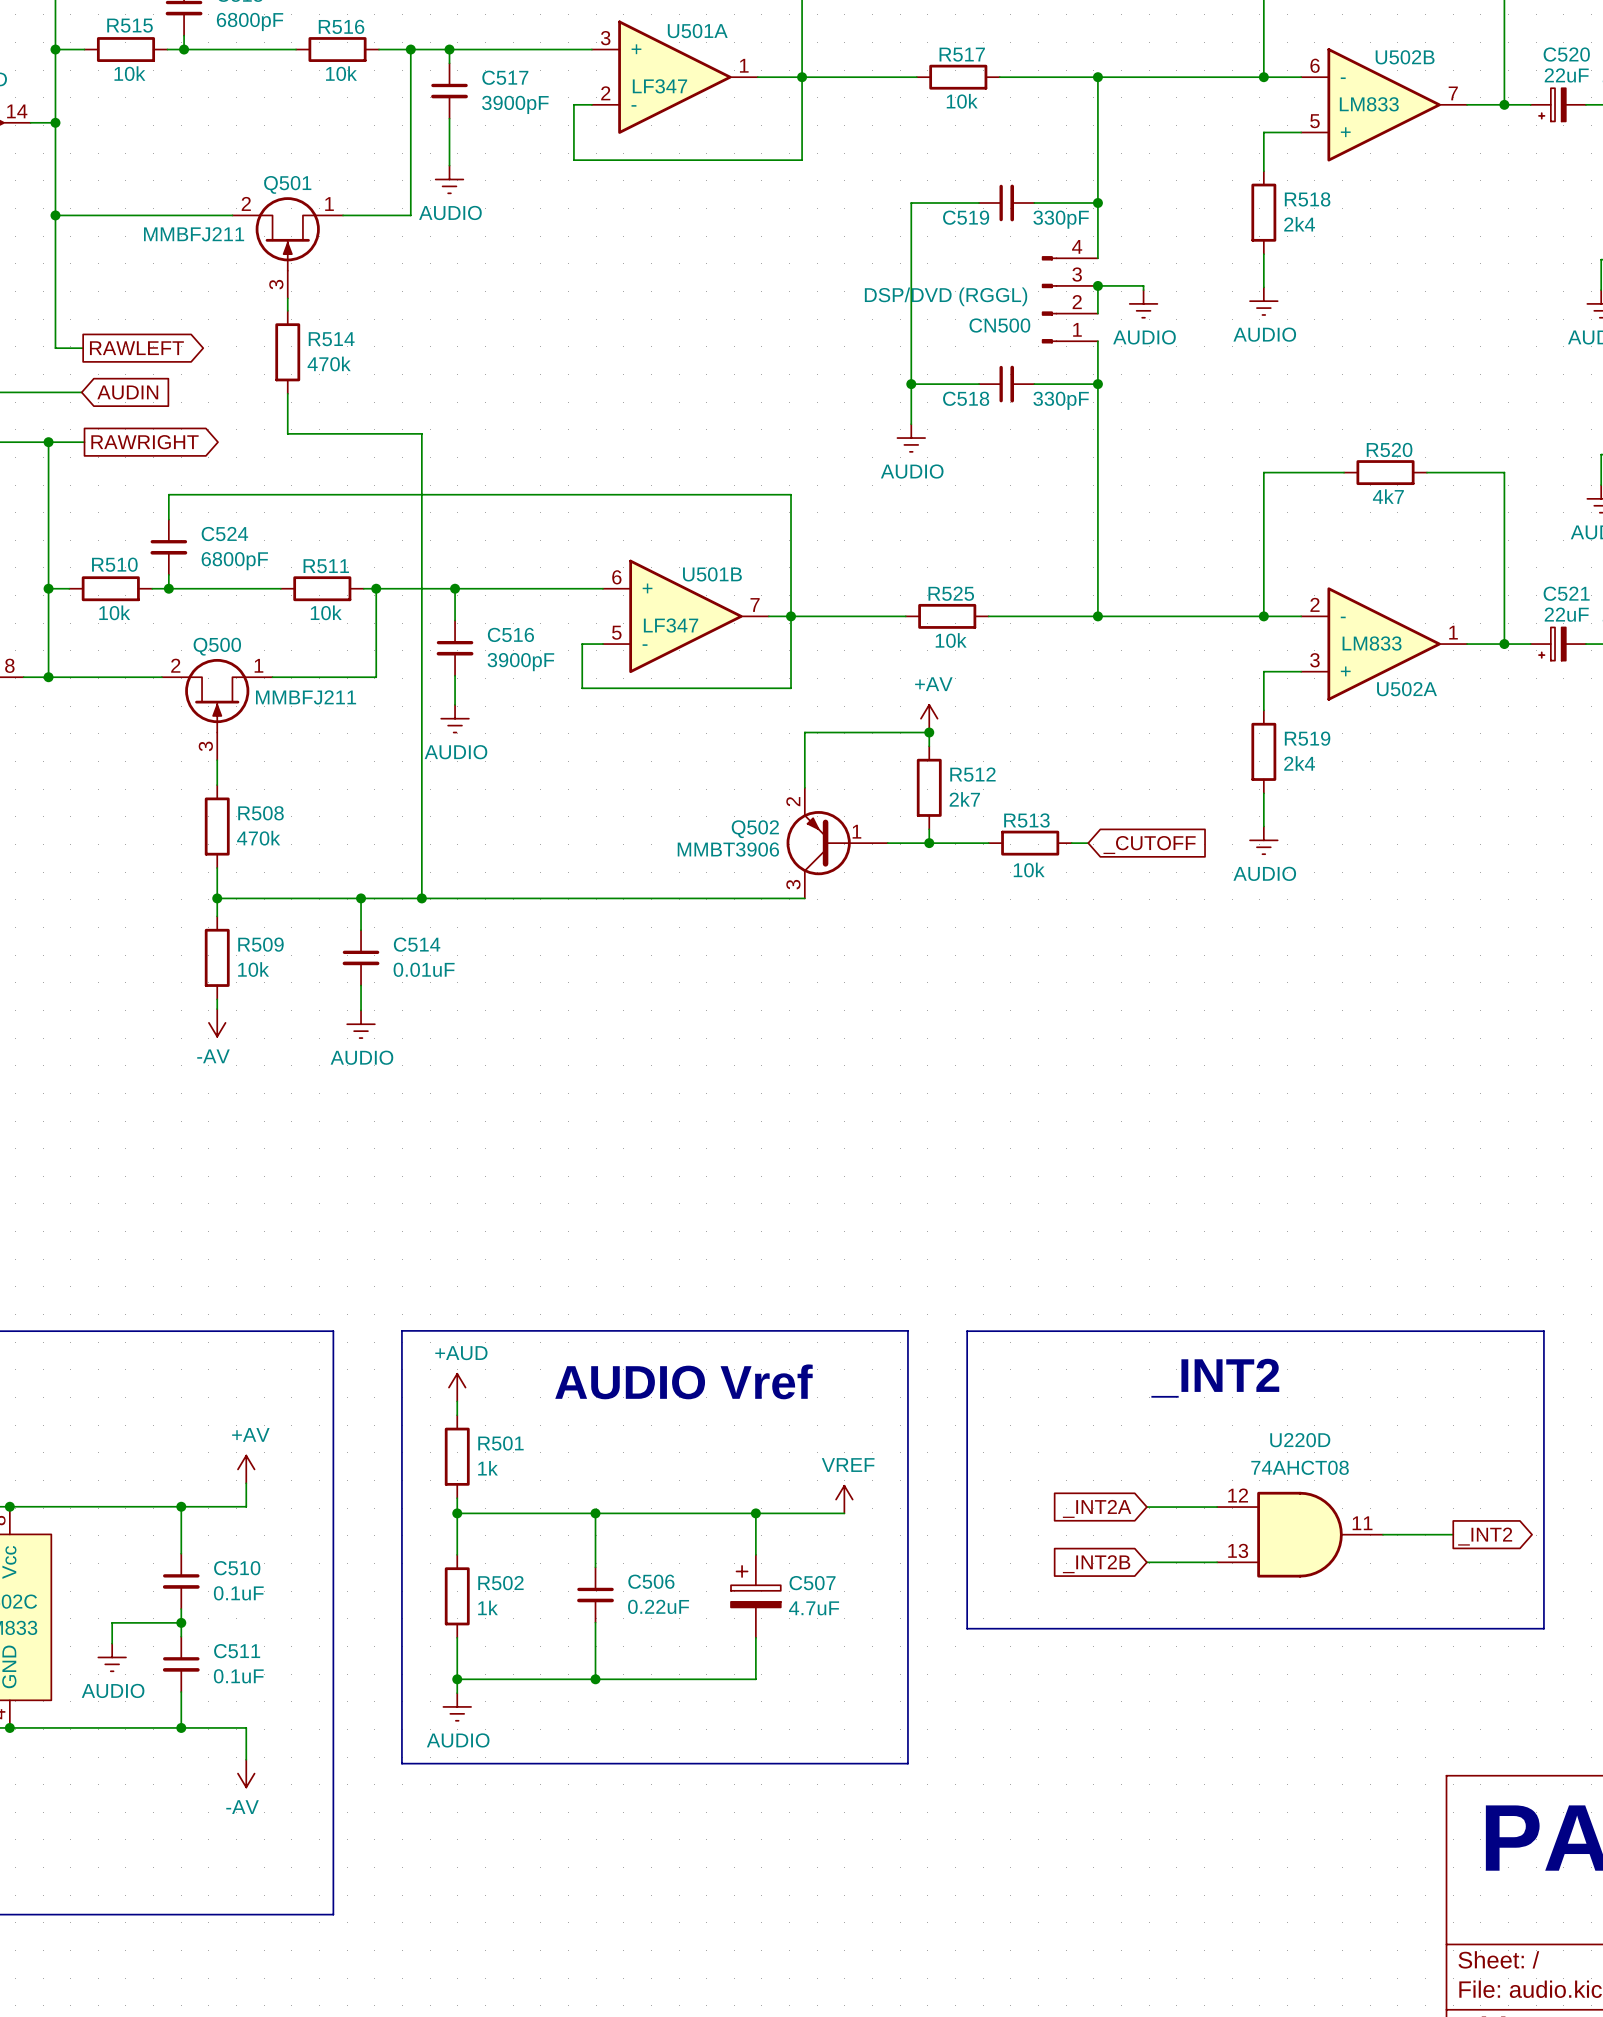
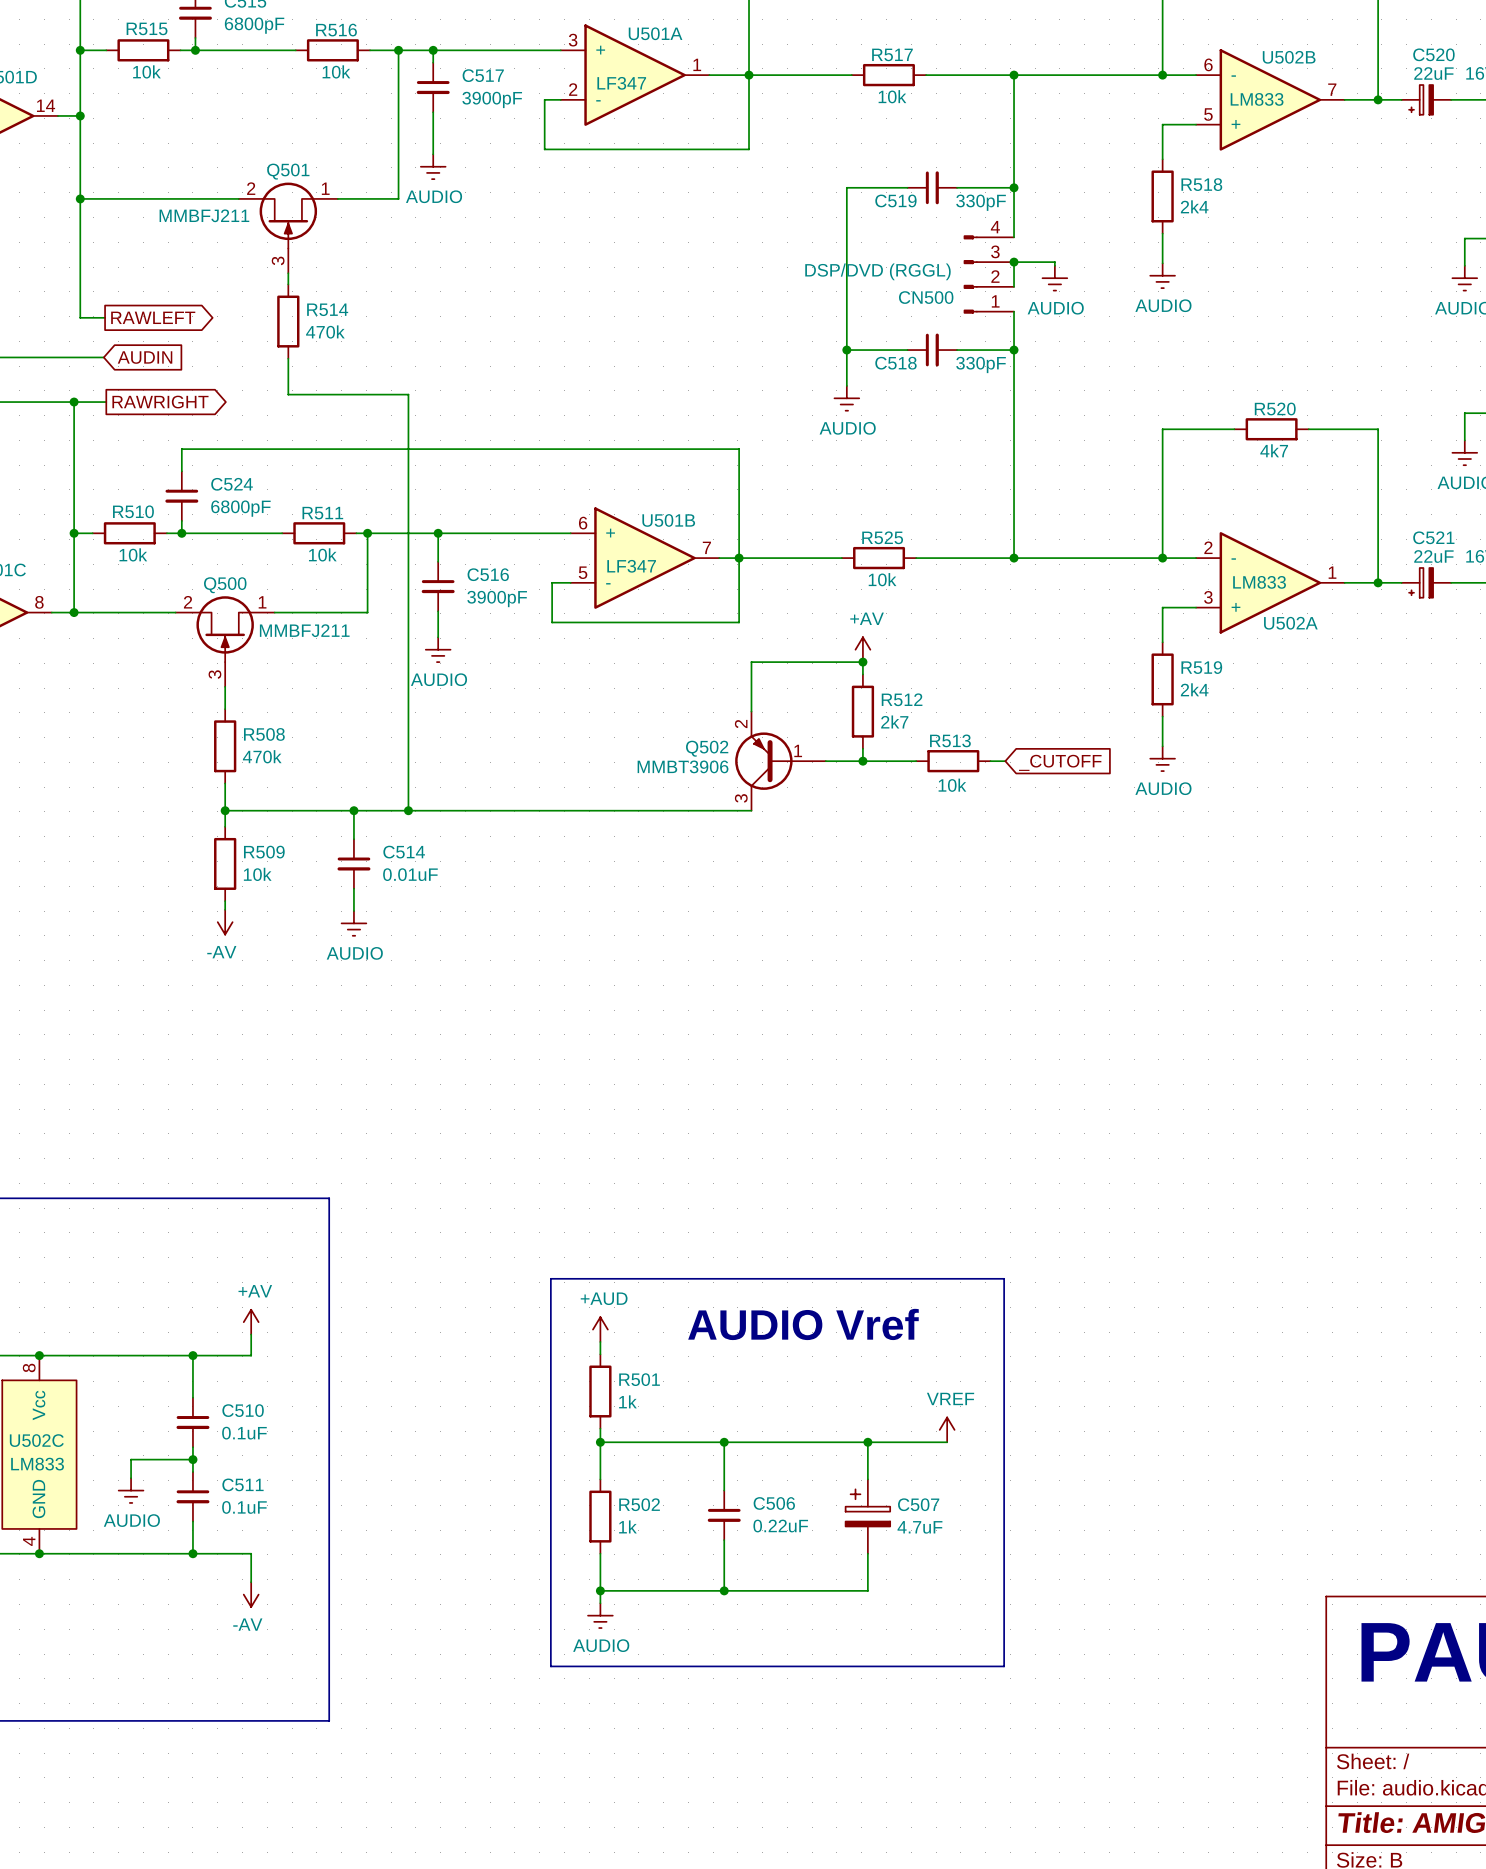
line: (401, 1330) (907, 1330) (907, 1763) (401, 1763) (401, 1330) -> (550, 1278) (1004, 1278) (1004, 1666) (550, 1666) (550, 1278)
line: (967, 1331) (1543, 1331) (1543, 1628) (967, 1628) (967, 1331) -> none
text: _INT2 (1215, 1378) -> none
text position: AUDIO Vref (683, 1381) -> AUDIO Vref (803, 1324)
power symbol position: +AUD (457, 1387) -> +AUD (600, 1329)
wire: (457, 1401) (457, 1415) -> (600, 1341) (600, 1354)
R501 position: (457, 1456) -> (600, 1391)
wire: (457, 1498) (457, 1554) -> (600, 1428) (600, 1479)
power symbol position: VREF (844, 1499) -> VREF (947, 1429)
wire: (1146, 1507) (1217, 1507) -> none
global label: _INT2A (1097, 1508) -> none
wire: (457, 1513) (844, 1513) -> (600, 1442) (947, 1442)
junction: (457, 1513) -> none
wire: (595, 1513) (595, 1567) -> (724, 1442) (724, 1490)
junction: (595, 1513) -> none
wire: (755, 1513) (755, 1554) -> (867, 1442) (867, 1479)
junction: (755, 1513) -> none
U220D: 74AHCT08 (1300, 1534) -> none
wire: (1383, 1534) (1453, 1534) -> none
global label: _INT2 (1485, 1536) -> none
wire: (1146, 1562) (1217, 1562) -> none
global label: _INT2B (1096, 1564) -> none
C506 position: (595, 1594) -> (724, 1515)
R502 position: (457, 1596) -> (600, 1516)
C507 position: (755, 1596) -> (867, 1516)
junction: none -> (600, 1442)
junction: none -> (724, 1442)
junction: none -> (867, 1442)
wire: (595, 1622) (595, 1679) -> (724, 1540) (724, 1590)
wire: (457, 1637) (457, 1693) -> (600, 1553) (600, 1603)
wire: (755, 1637) (755, 1679) (457, 1679) -> (867, 1553) (867, 1590) (600, 1590)
junction: (457, 1679) -> none
junction: (595, 1679) -> none
power symbol position: AUDIO (457, 1706) -> AUDIO (600, 1615)
junction: none -> (600, 1590)
junction: none -> (724, 1590)

